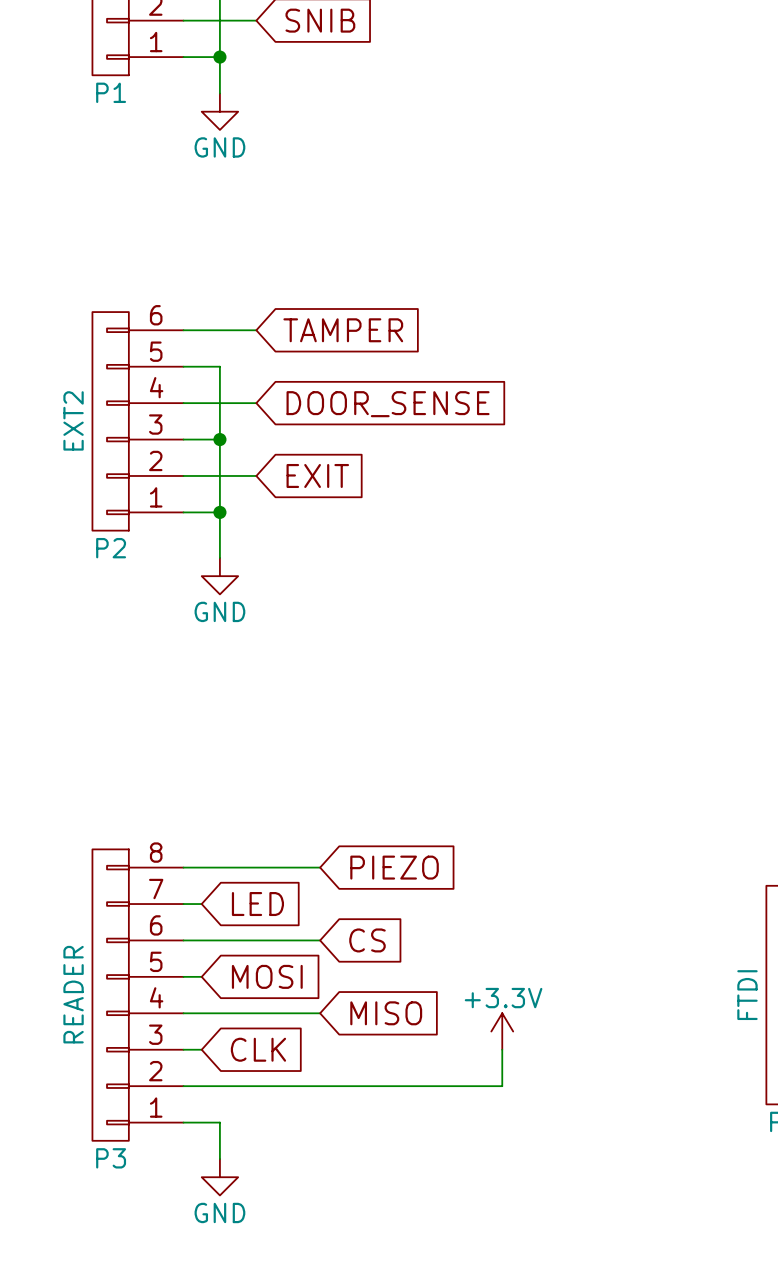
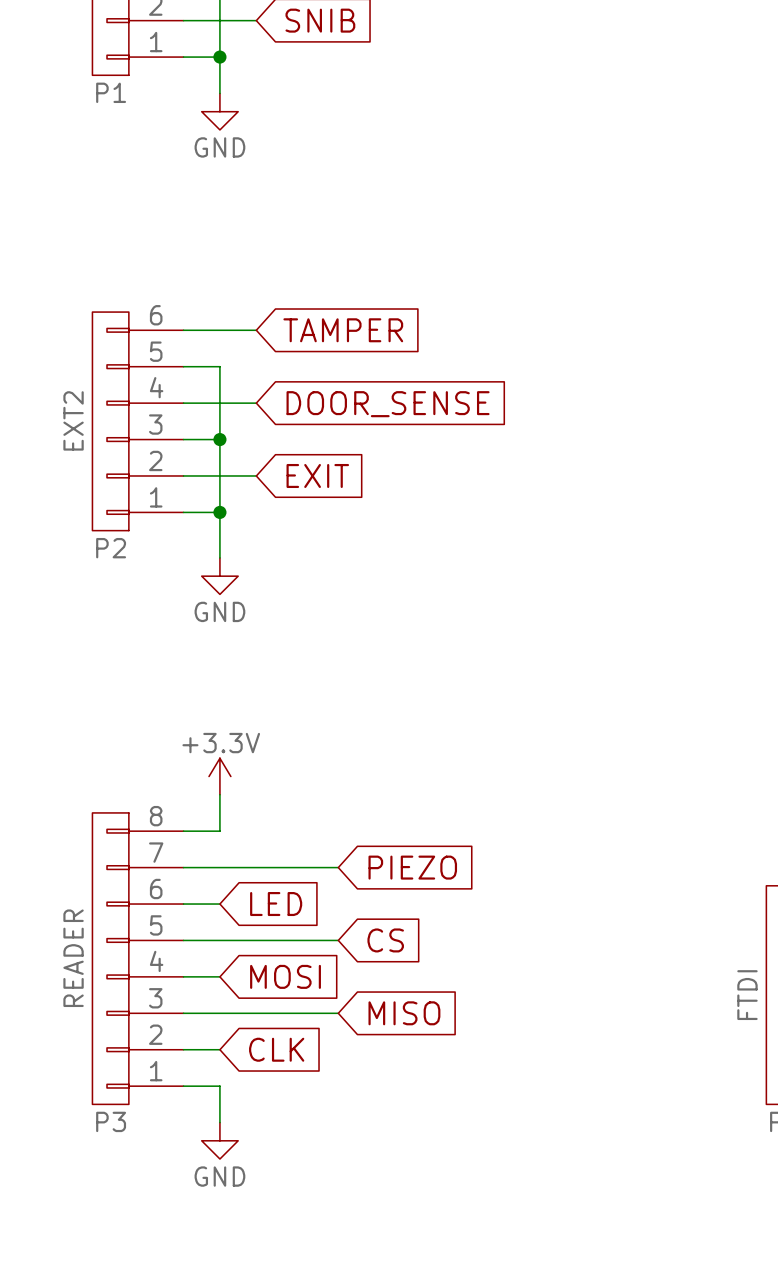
power symbol: none -> +3.3V (219, 776)
wire: none -> (219, 794) (219, 831) (183, 831)
wire: none -> (320, 867) (338, 867)
global label position: PIEZO (394, 867) -> PIEZO (412, 867)
wire: none -> (201, 904) (219, 904)
global label position: LED (257, 904) -> LED (276, 904)
wire: none -> (320, 940) (338, 940)
global label position: CS (367, 940) -> CS (385, 940)
wire: none -> (201, 976) (219, 976)
global label position: MOSI (267, 976) -> MOSI (285, 976)
P3 position: (137, 995) -> (137, 958)
wire: none -> (320, 1013) (338, 1013)
global label position: MISO (386, 1013) -> MISO (404, 1013)
power symbol: +3.3V (502, 1031) -> none
wire: none -> (201, 1049) (219, 1049)
global label position: CLK (258, 1049) -> CLK (276, 1049)
wire: (502, 1049) (502, 1086) (219, 1086) -> (219, 1122) (219, 1086)
wire: (183, 1122) (219, 1122) (219, 1159) -> none
power symbol position: GND (219, 1177) -> GND (219, 1140)

